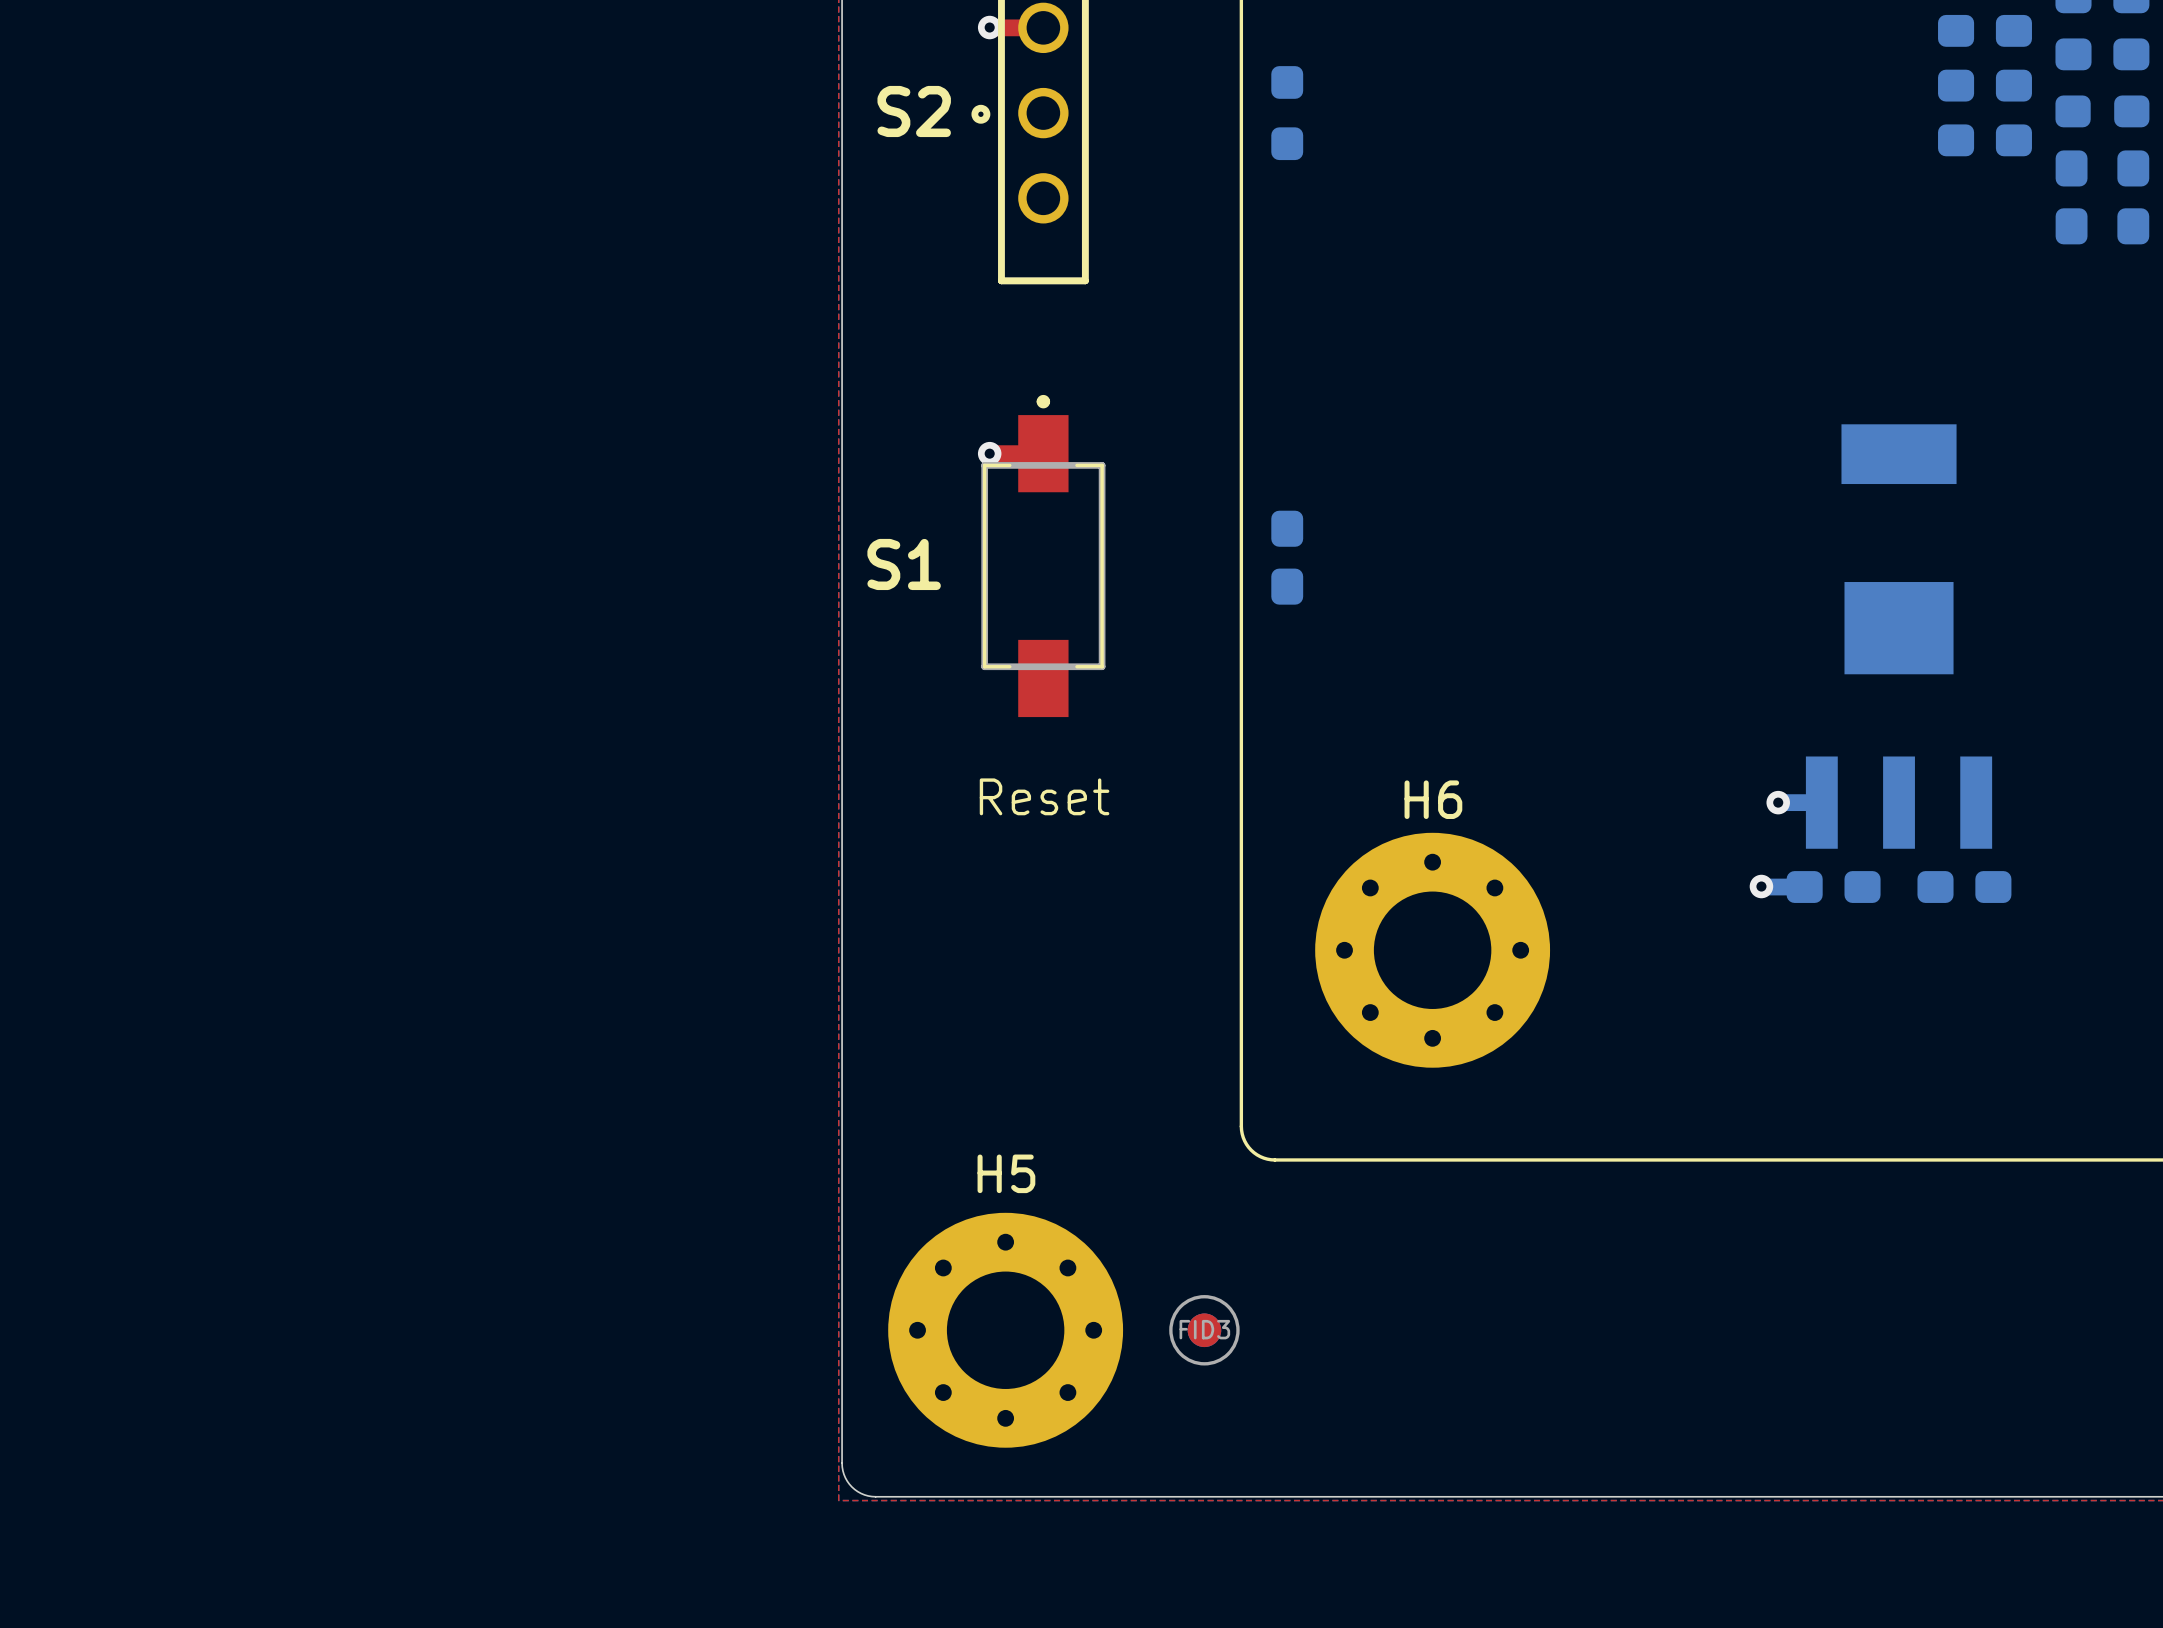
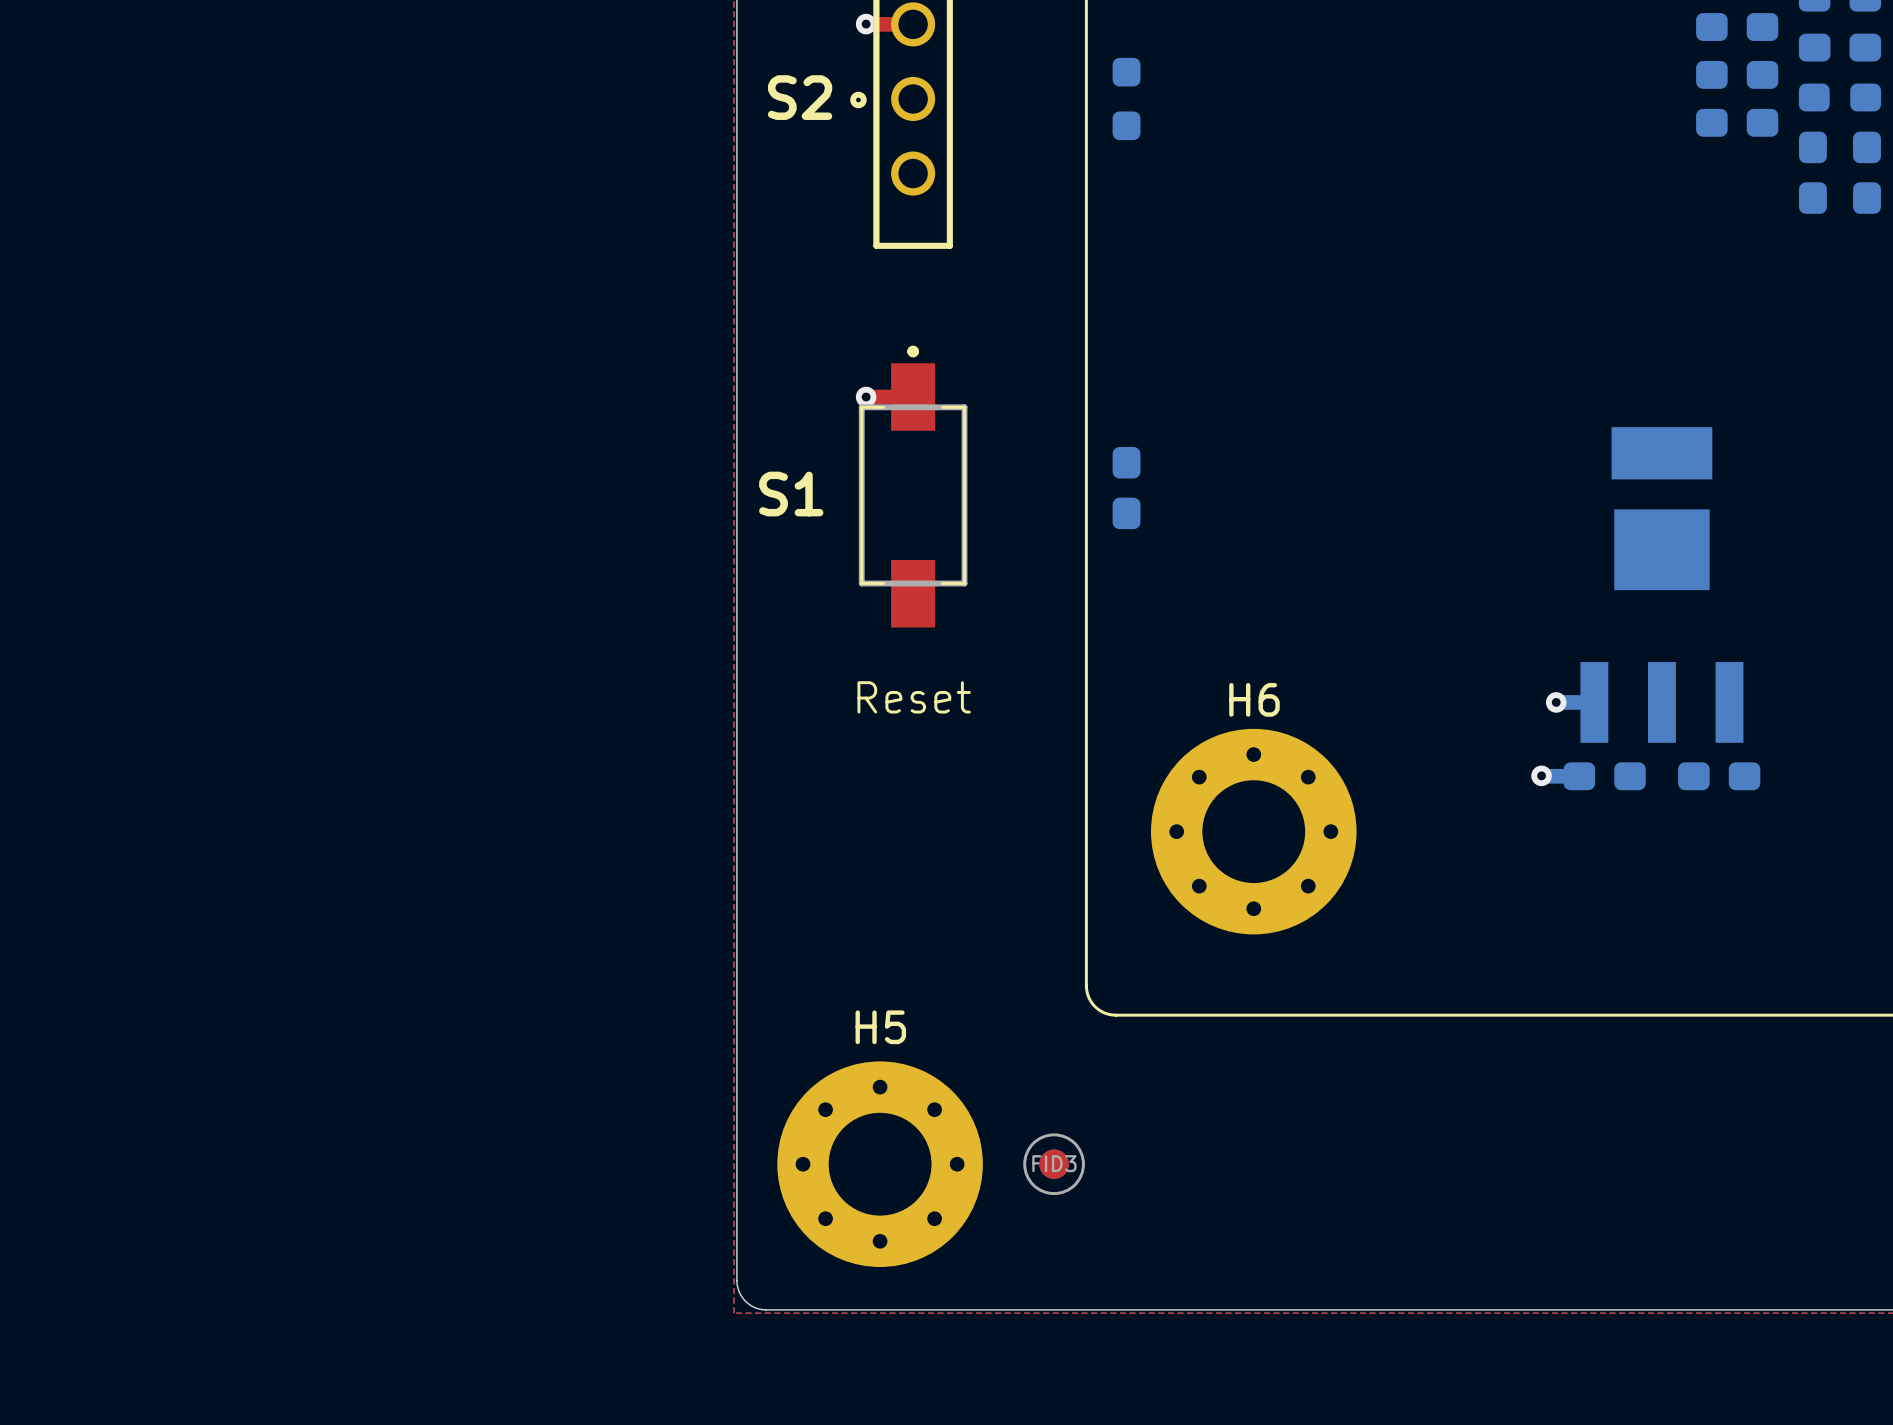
part position: (1899, 454) -> (1661, 453)

